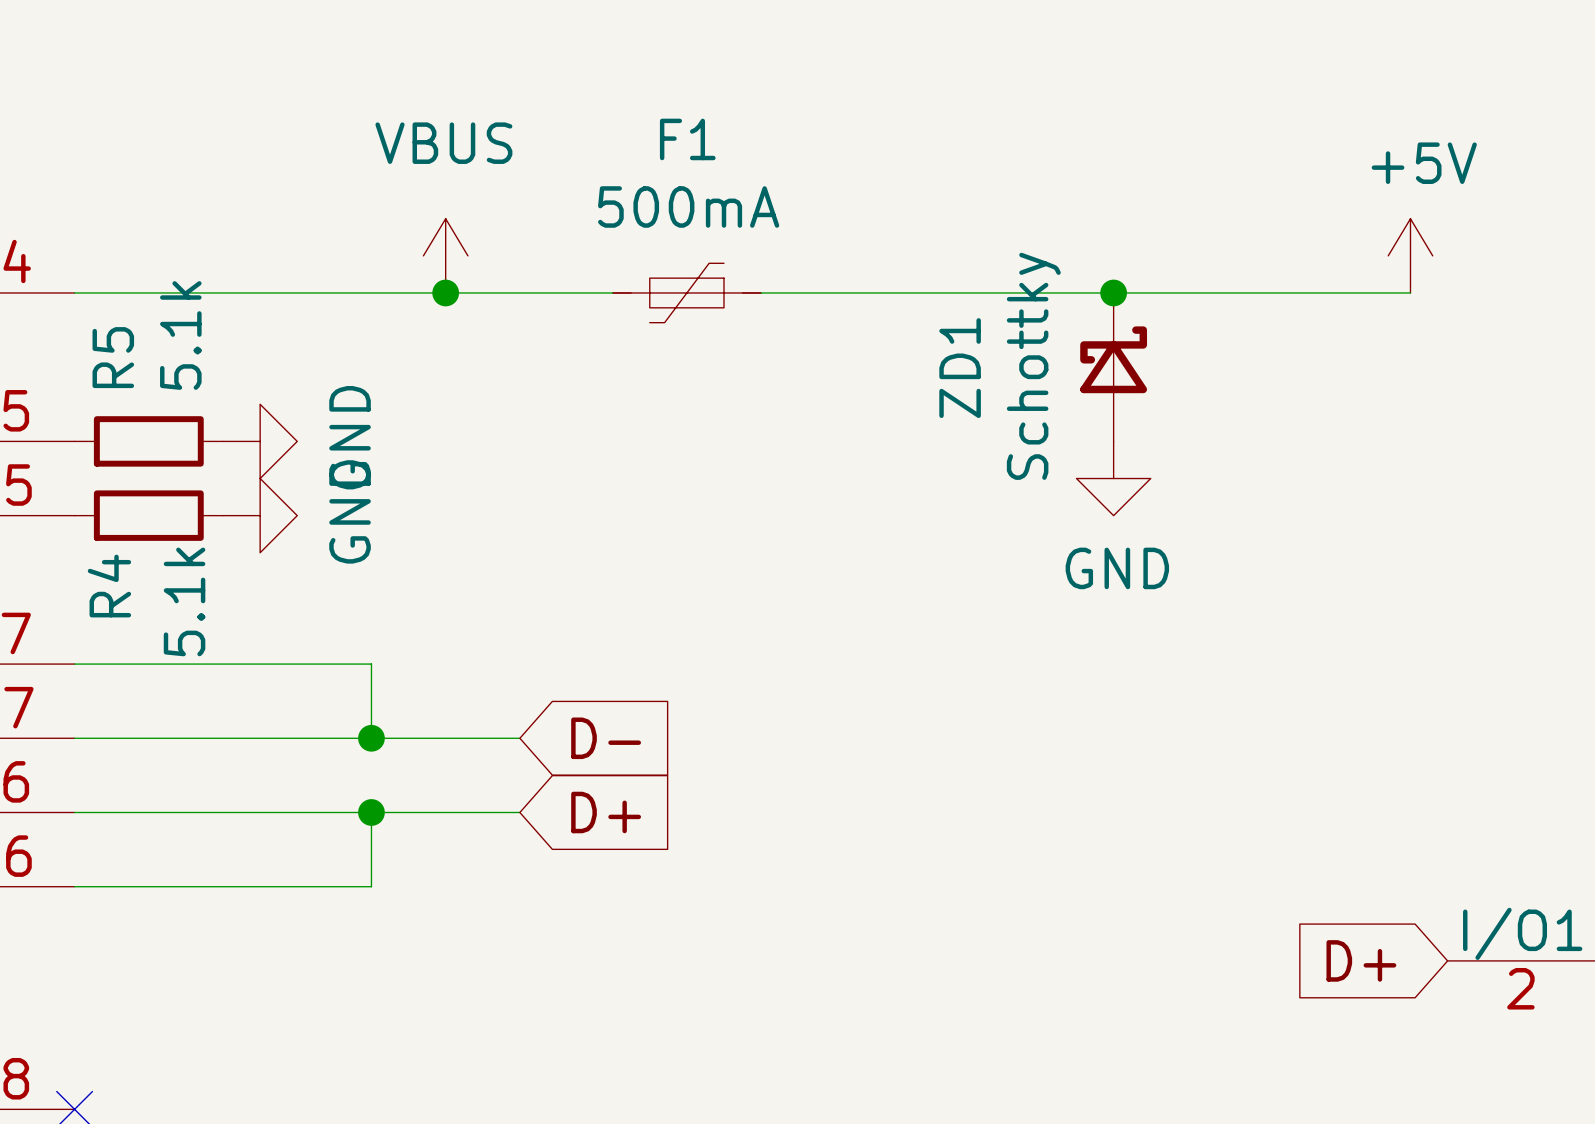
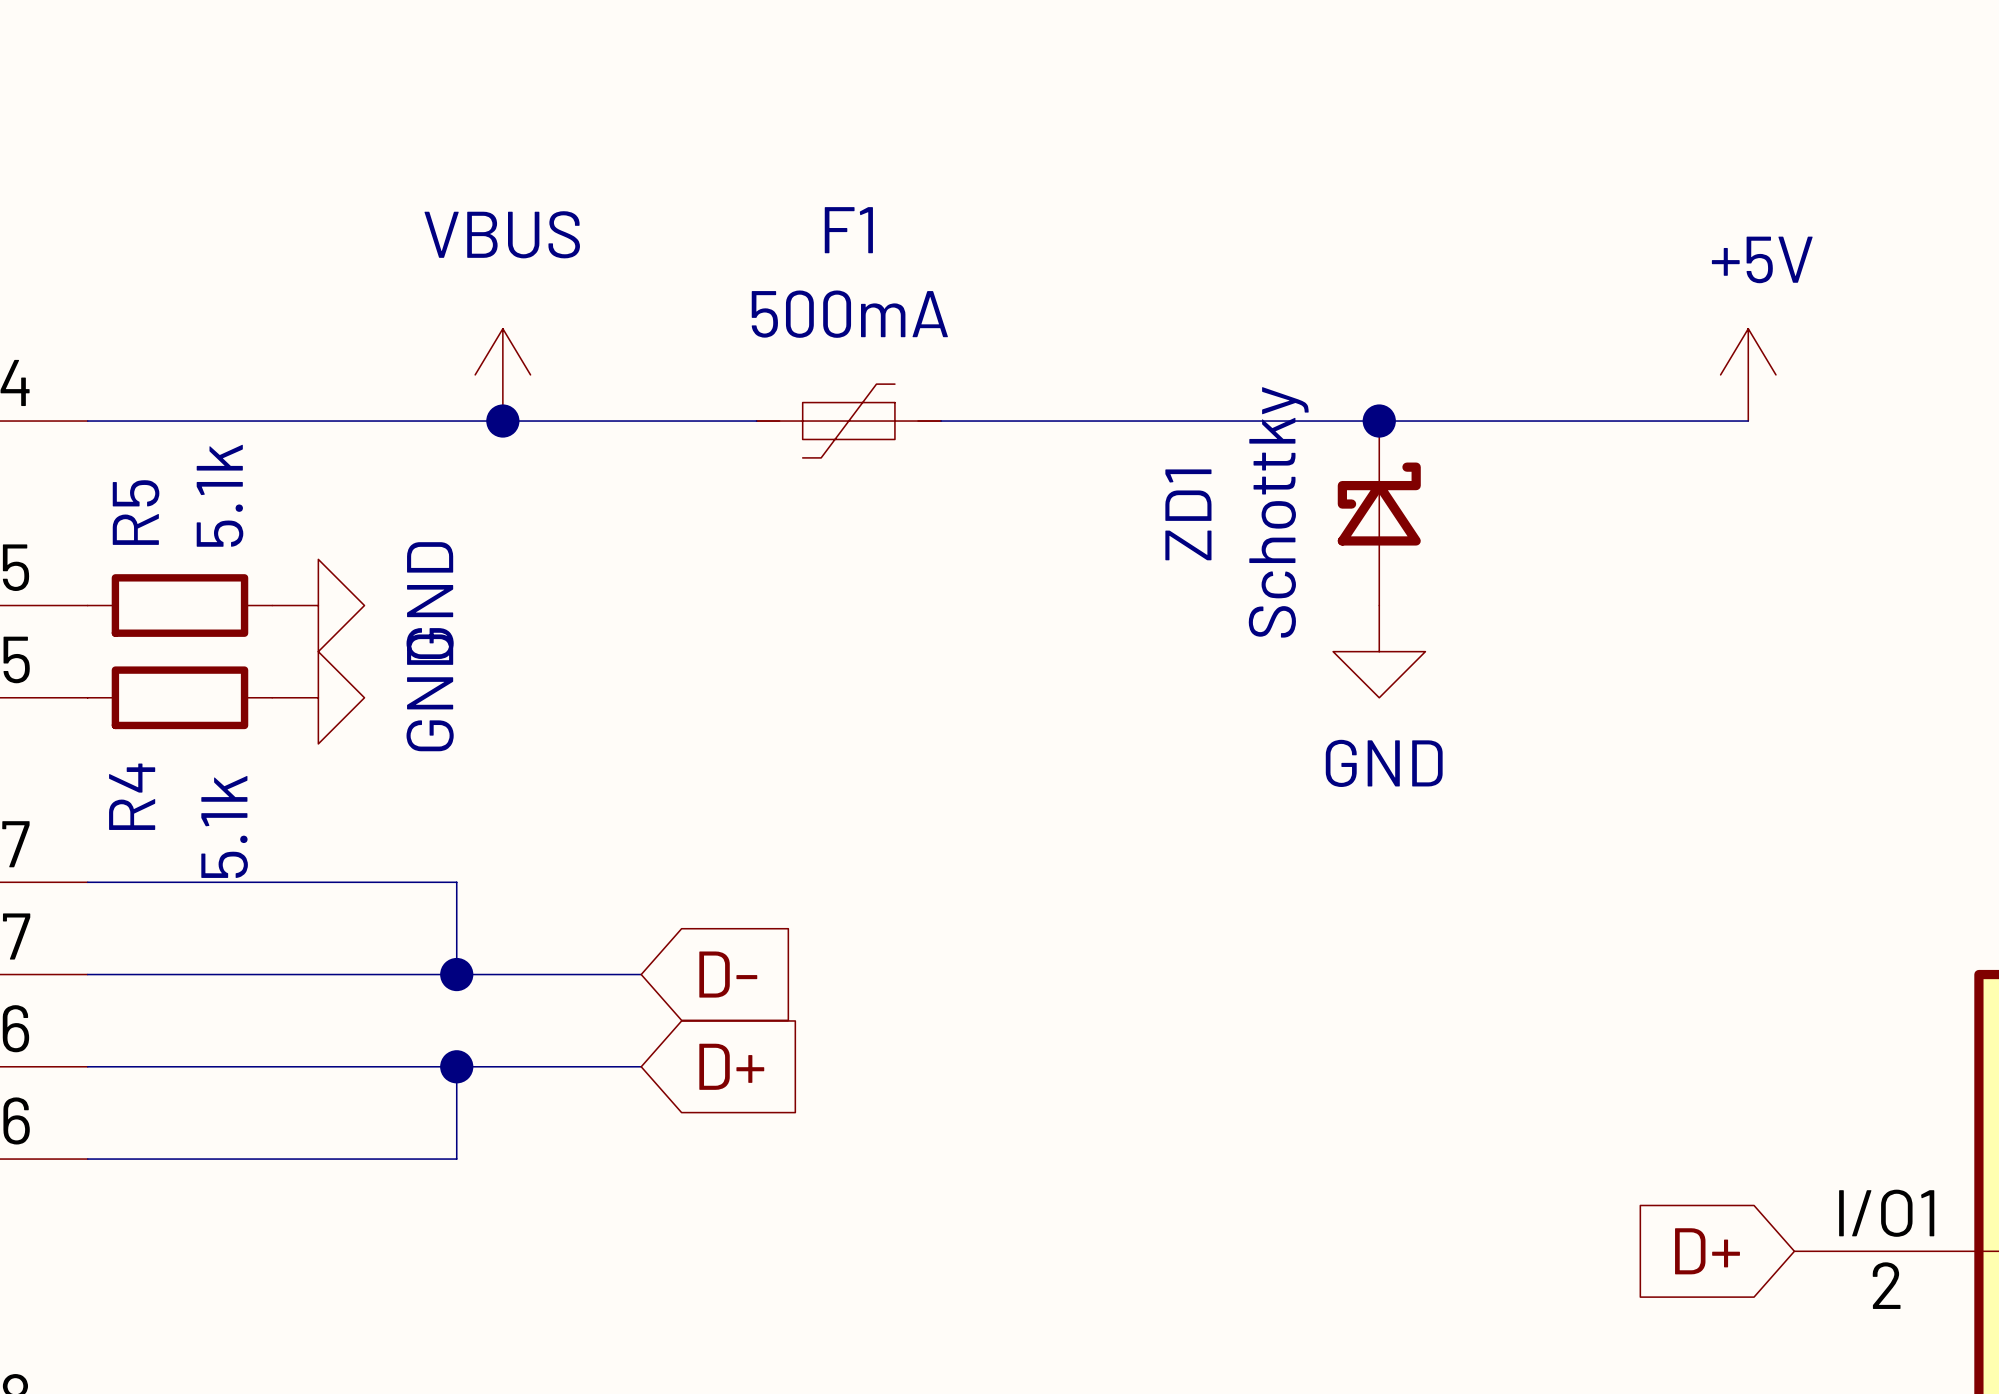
power symbol position: VBUS (445, 255) -> VBUS (502, 374)
junction position: (445, 292) -> (502, 421)

